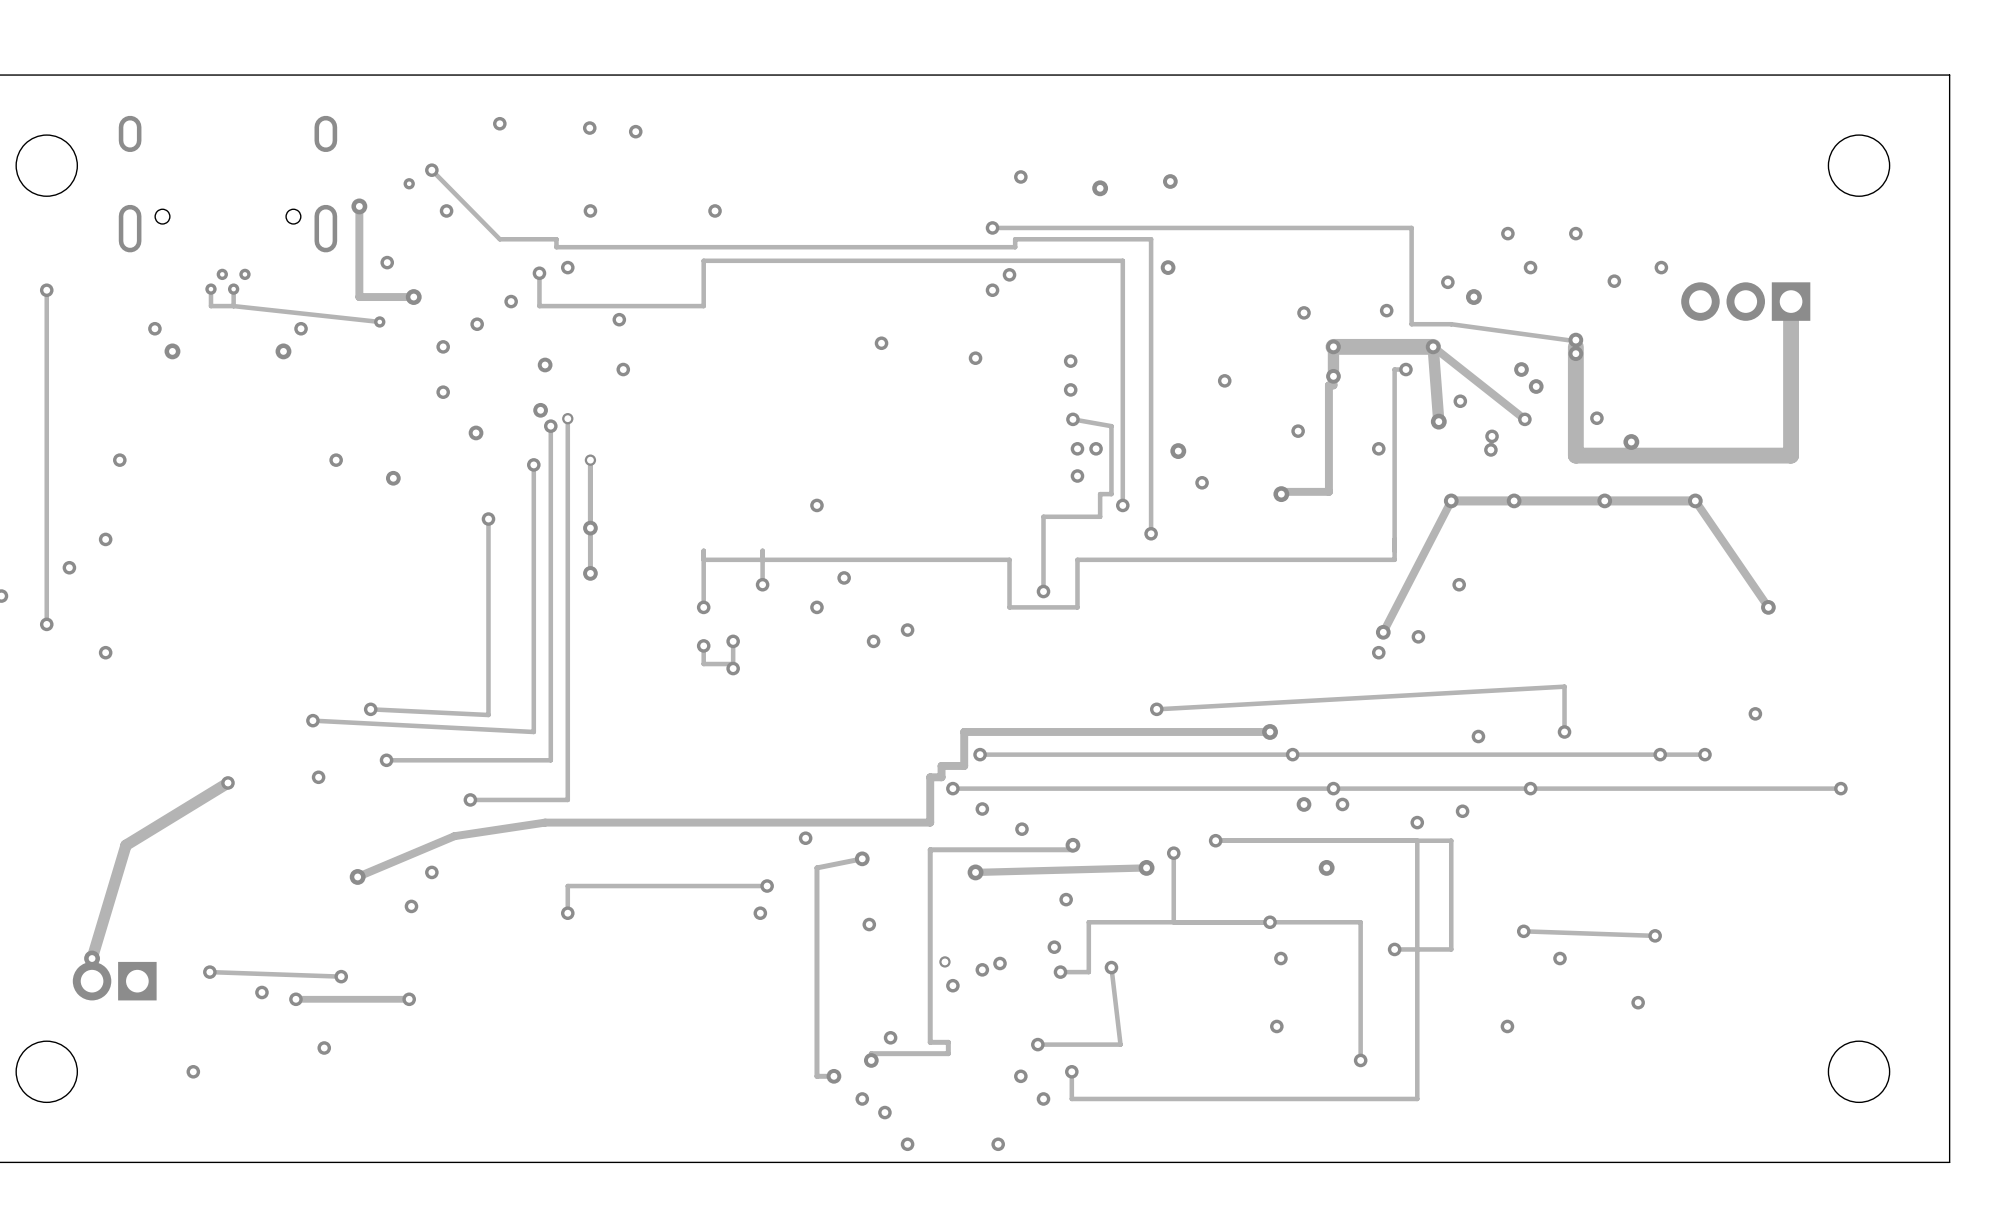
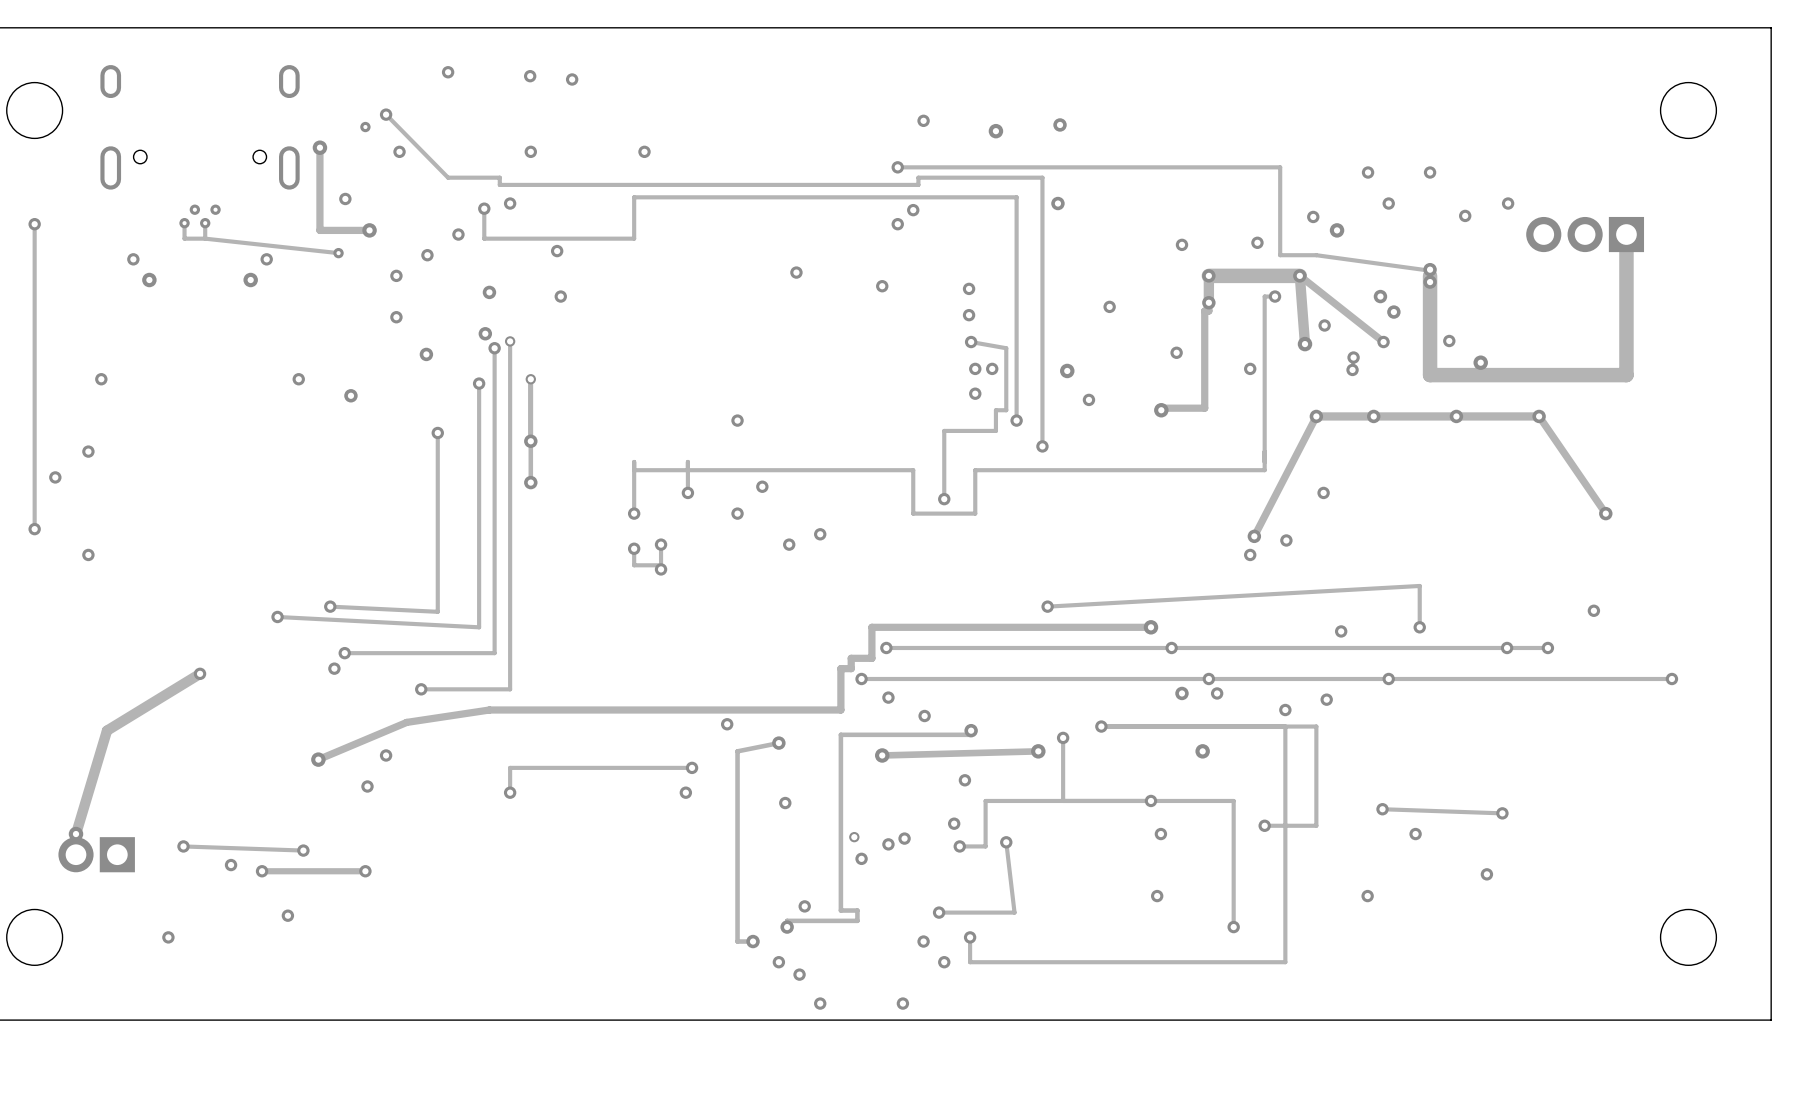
via position: (318, 777) -> (334, 668)

